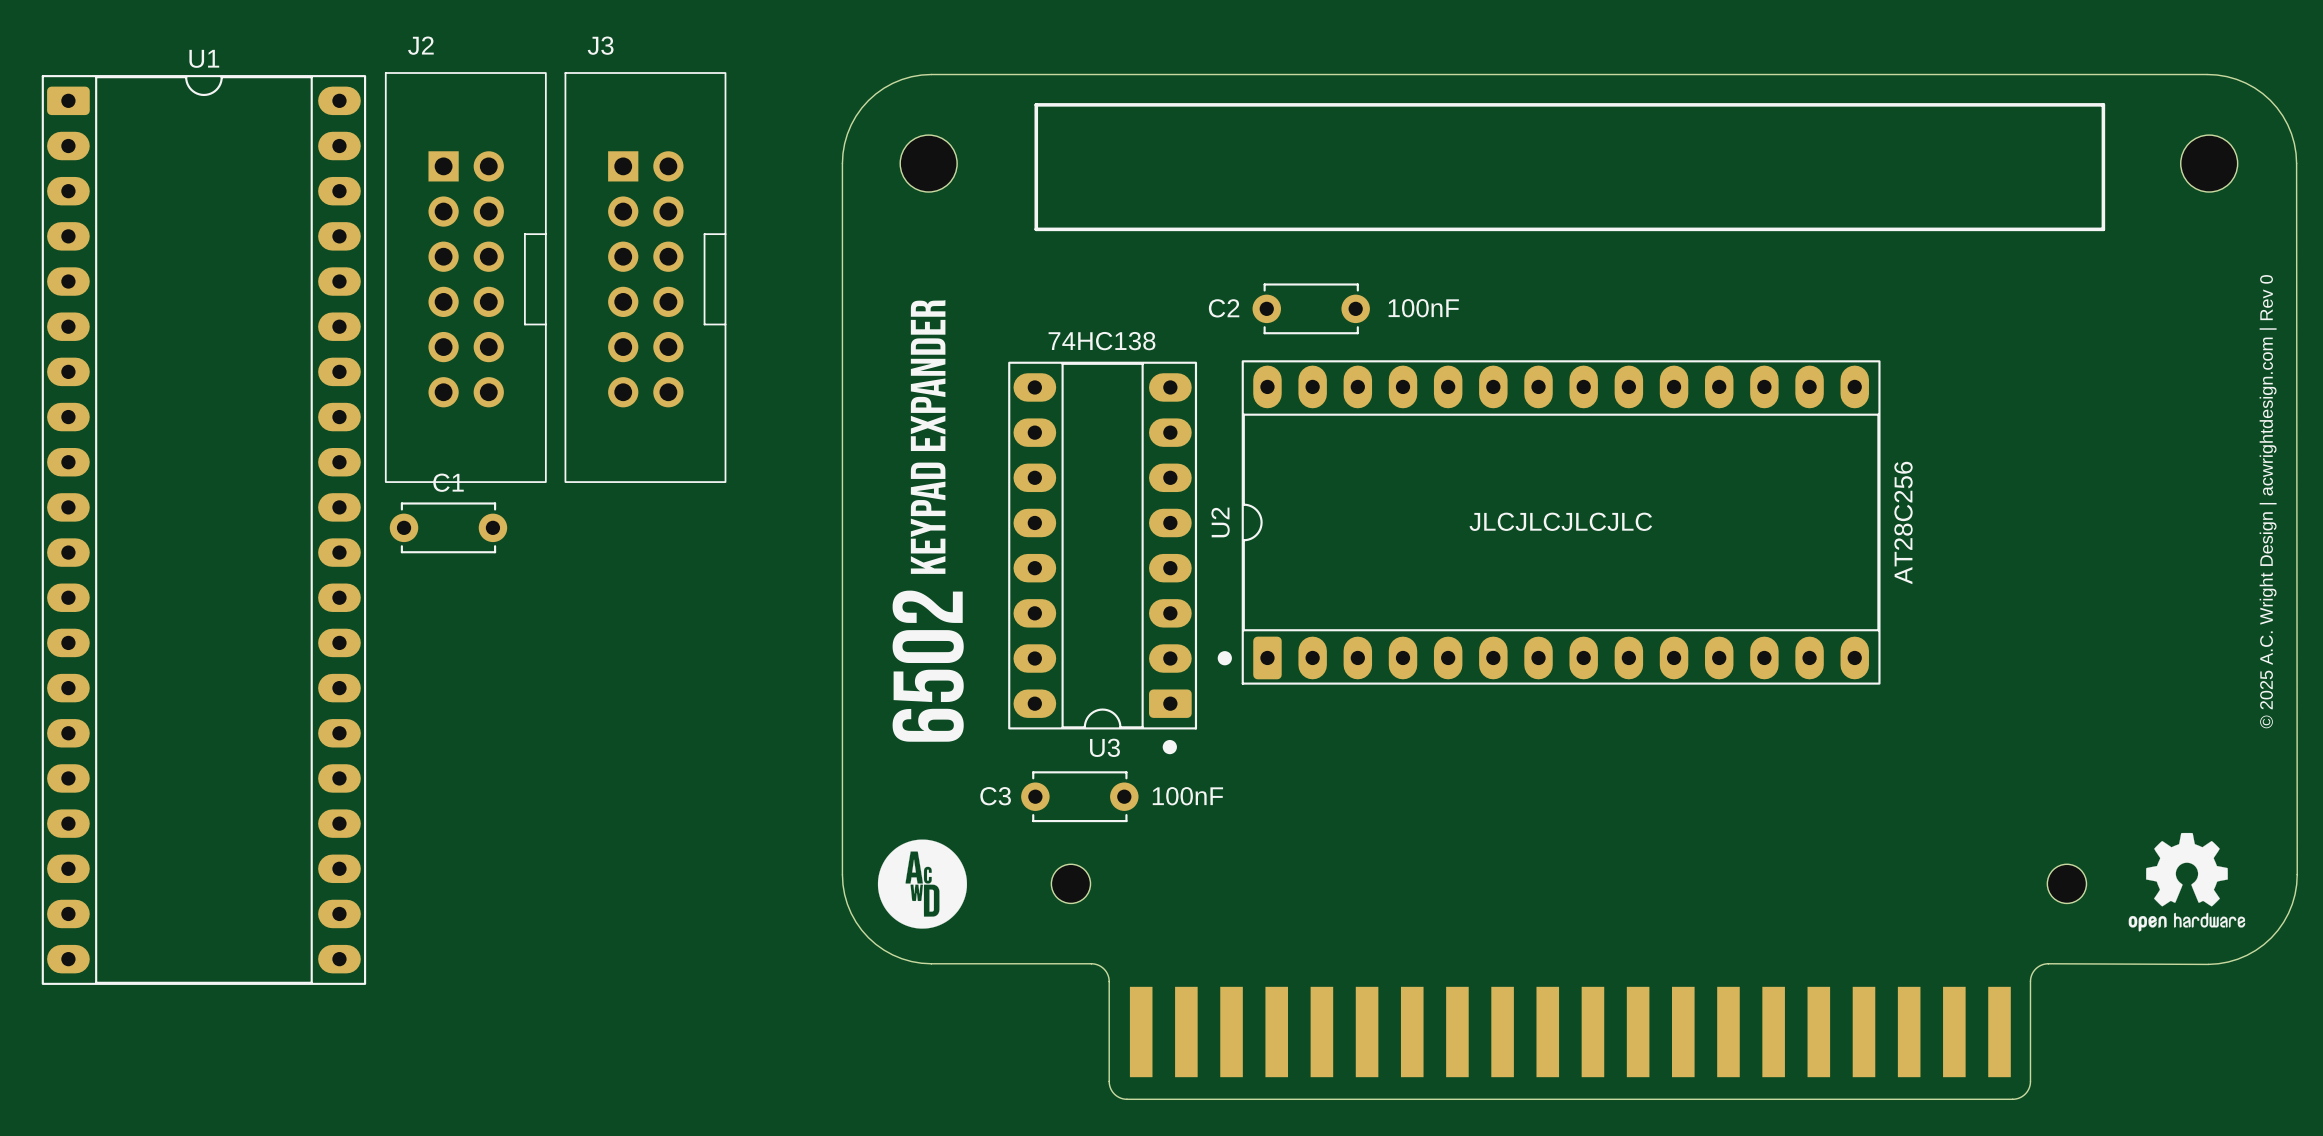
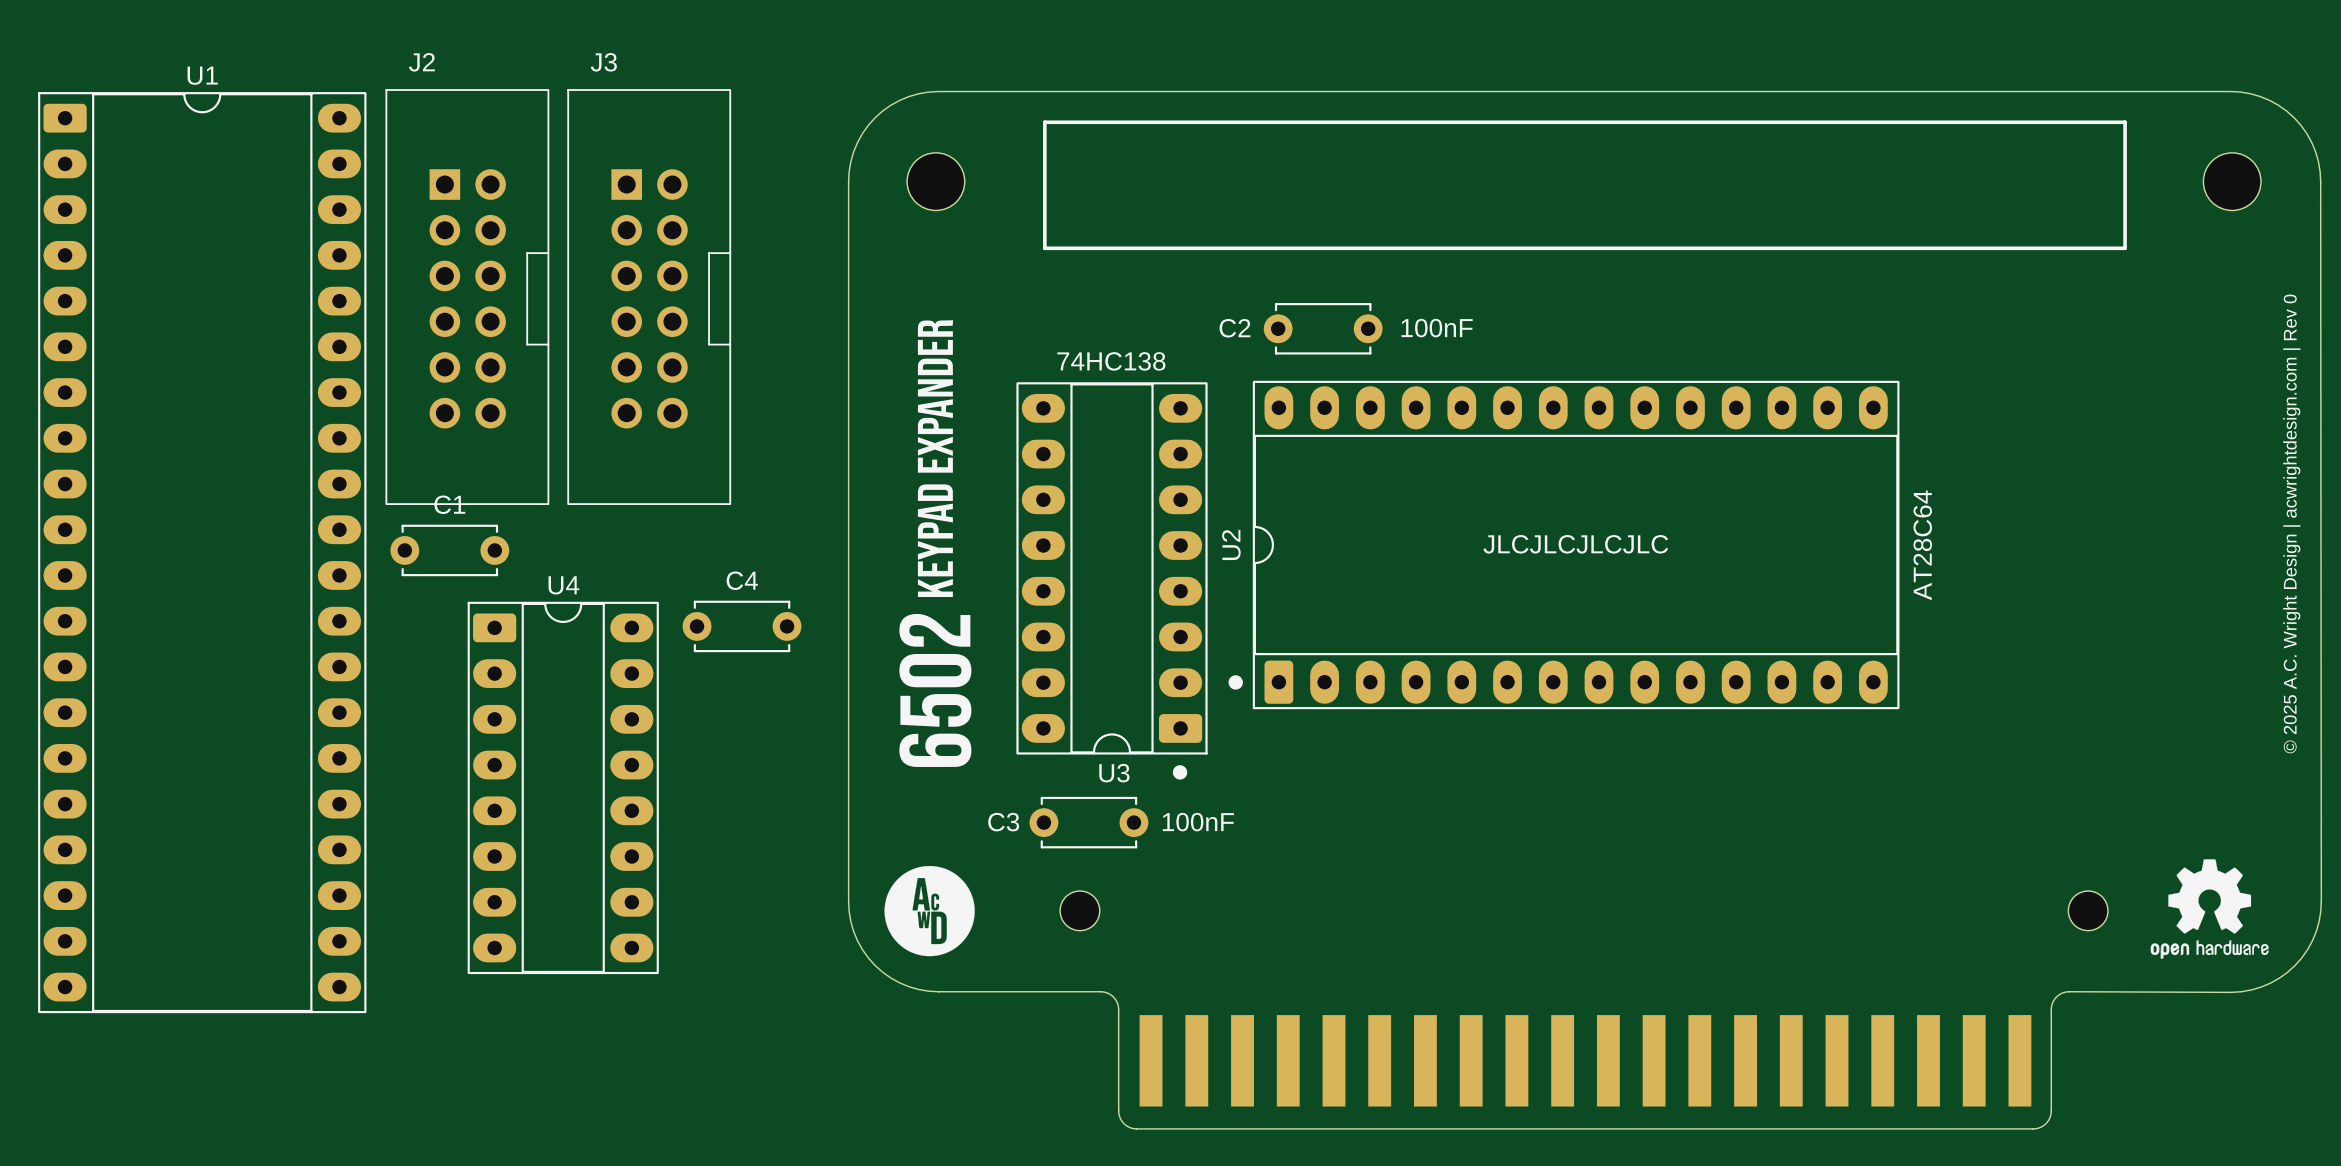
U2 value: AT28C256 (1903, 523) -> AT28C64 (1922, 545)
C4: none -> (742, 626)
U4: none -> (563, 787)

